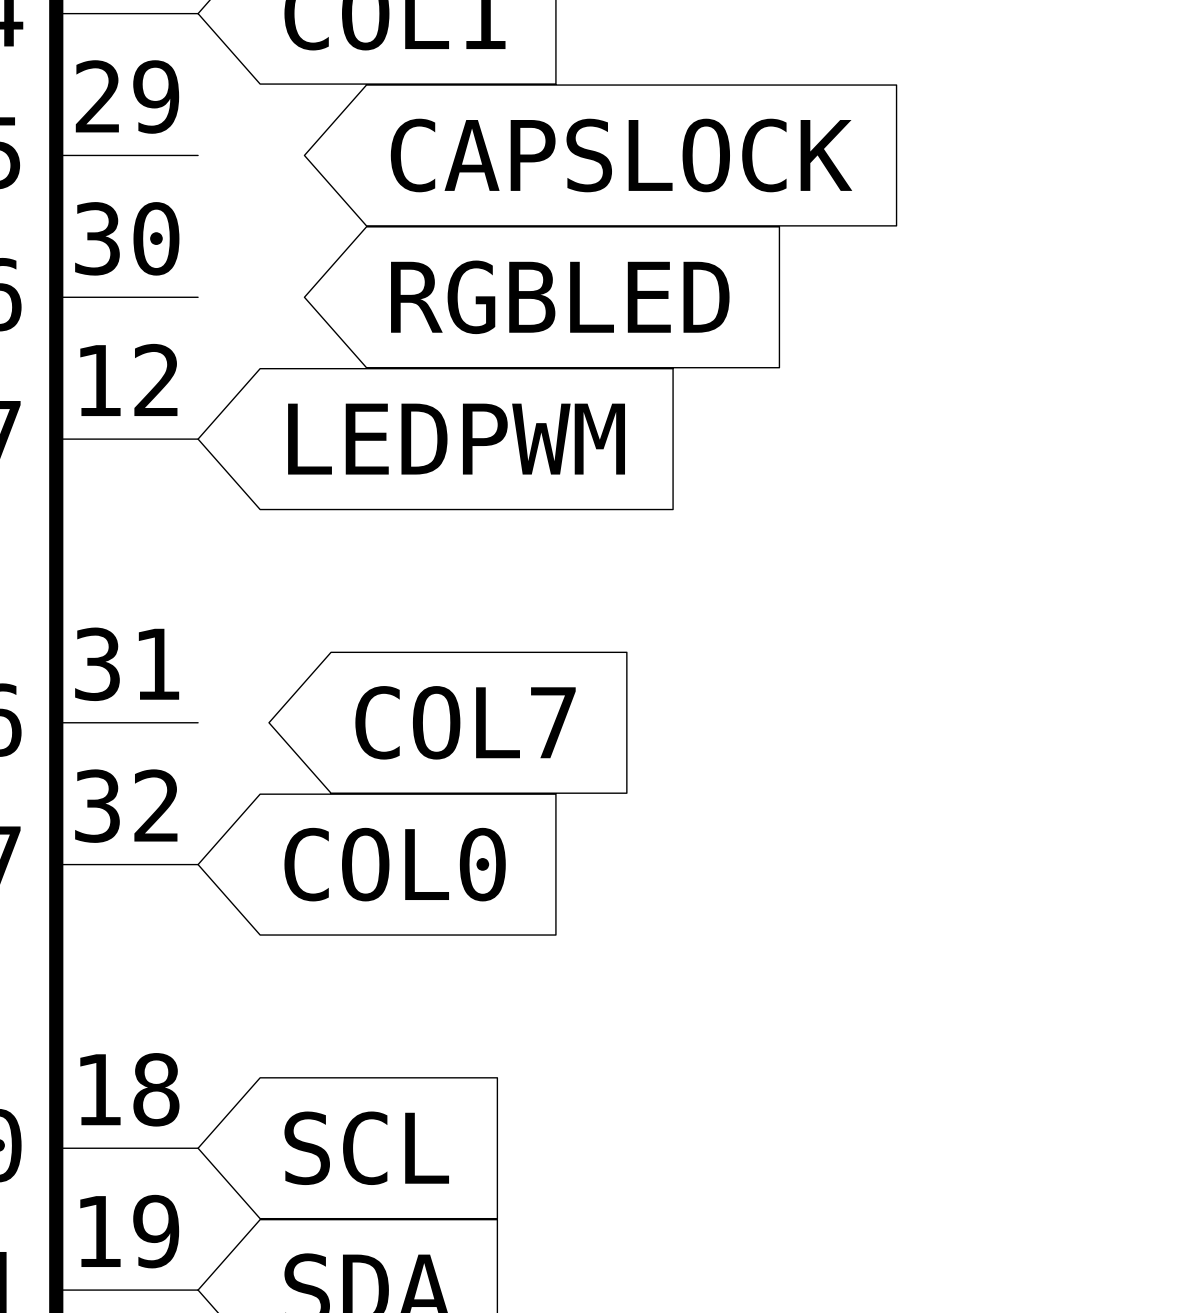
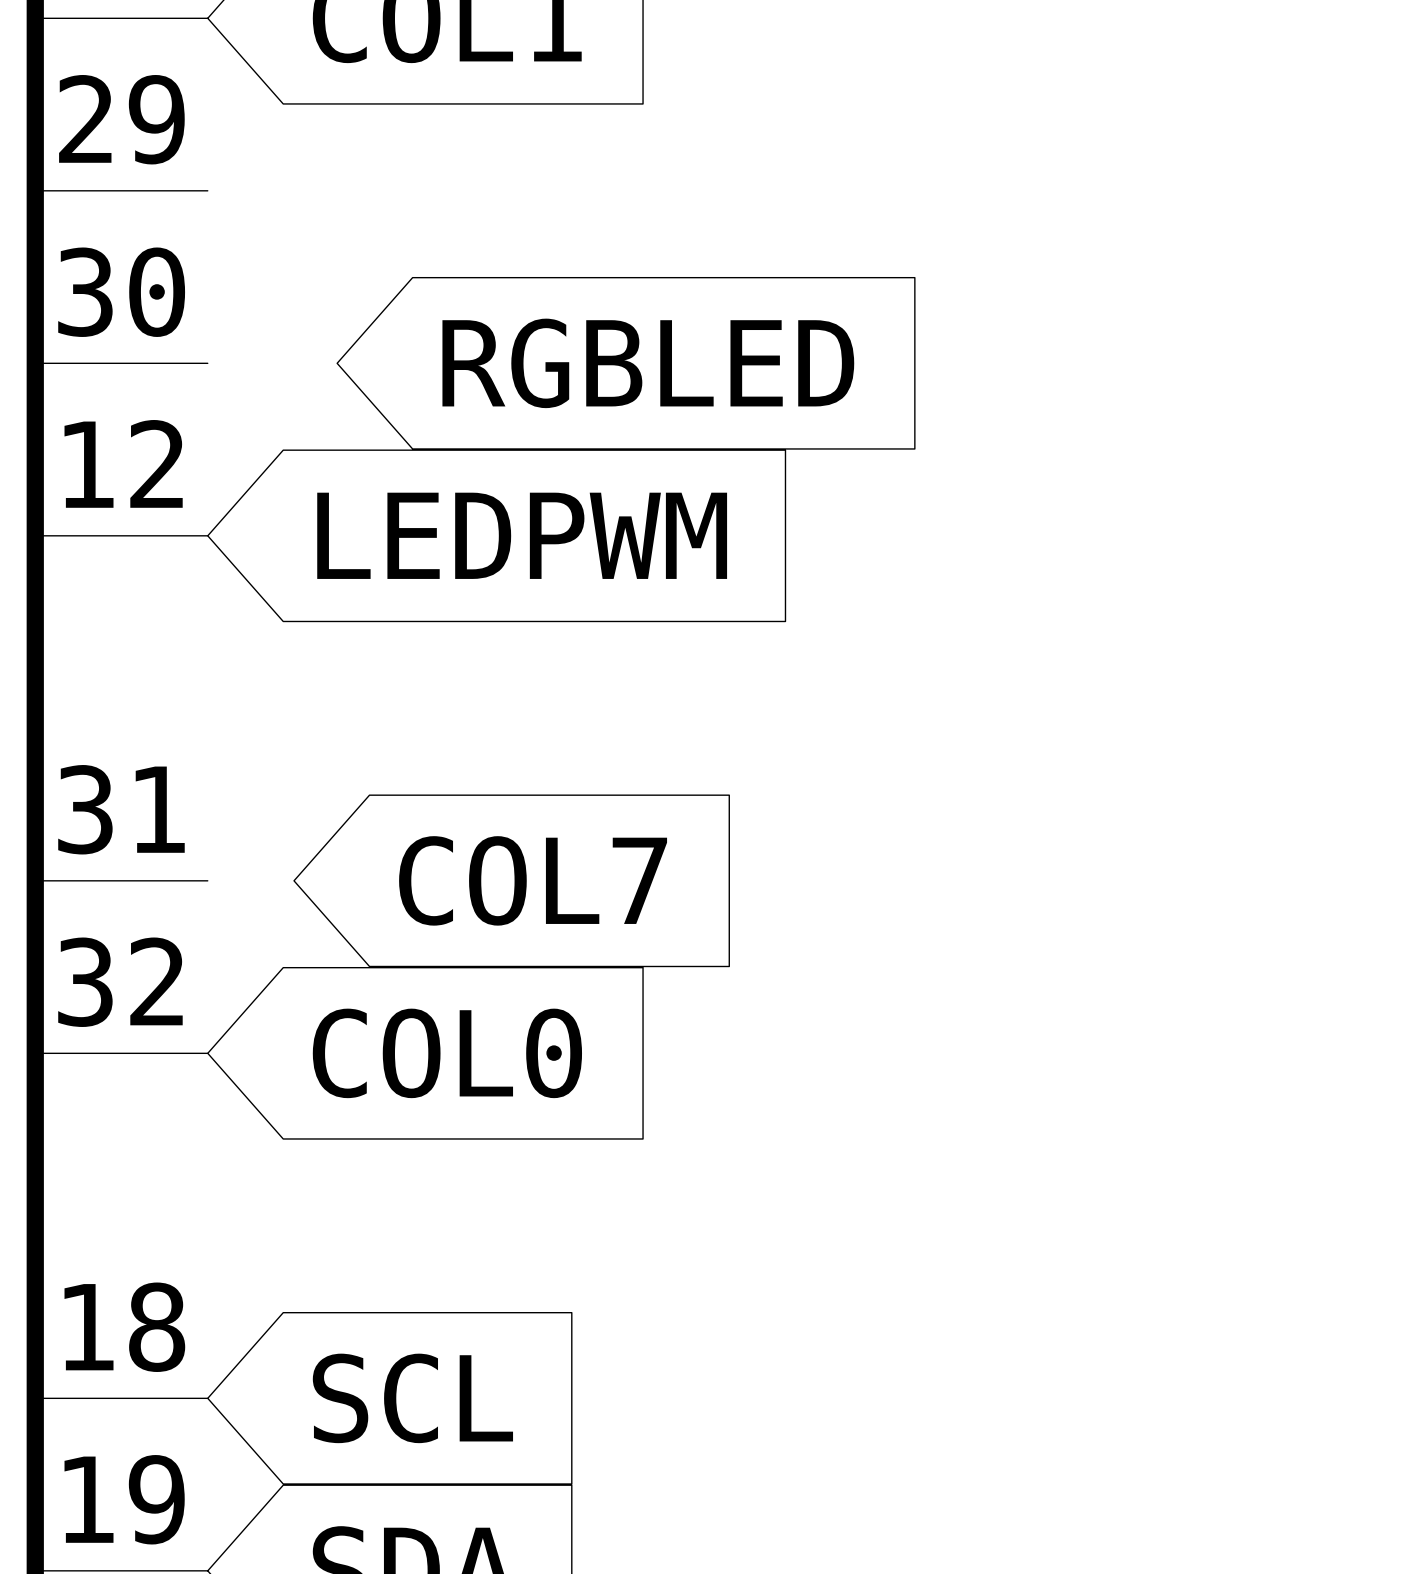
global label: CAPSLOCK (621, 155) -> none

